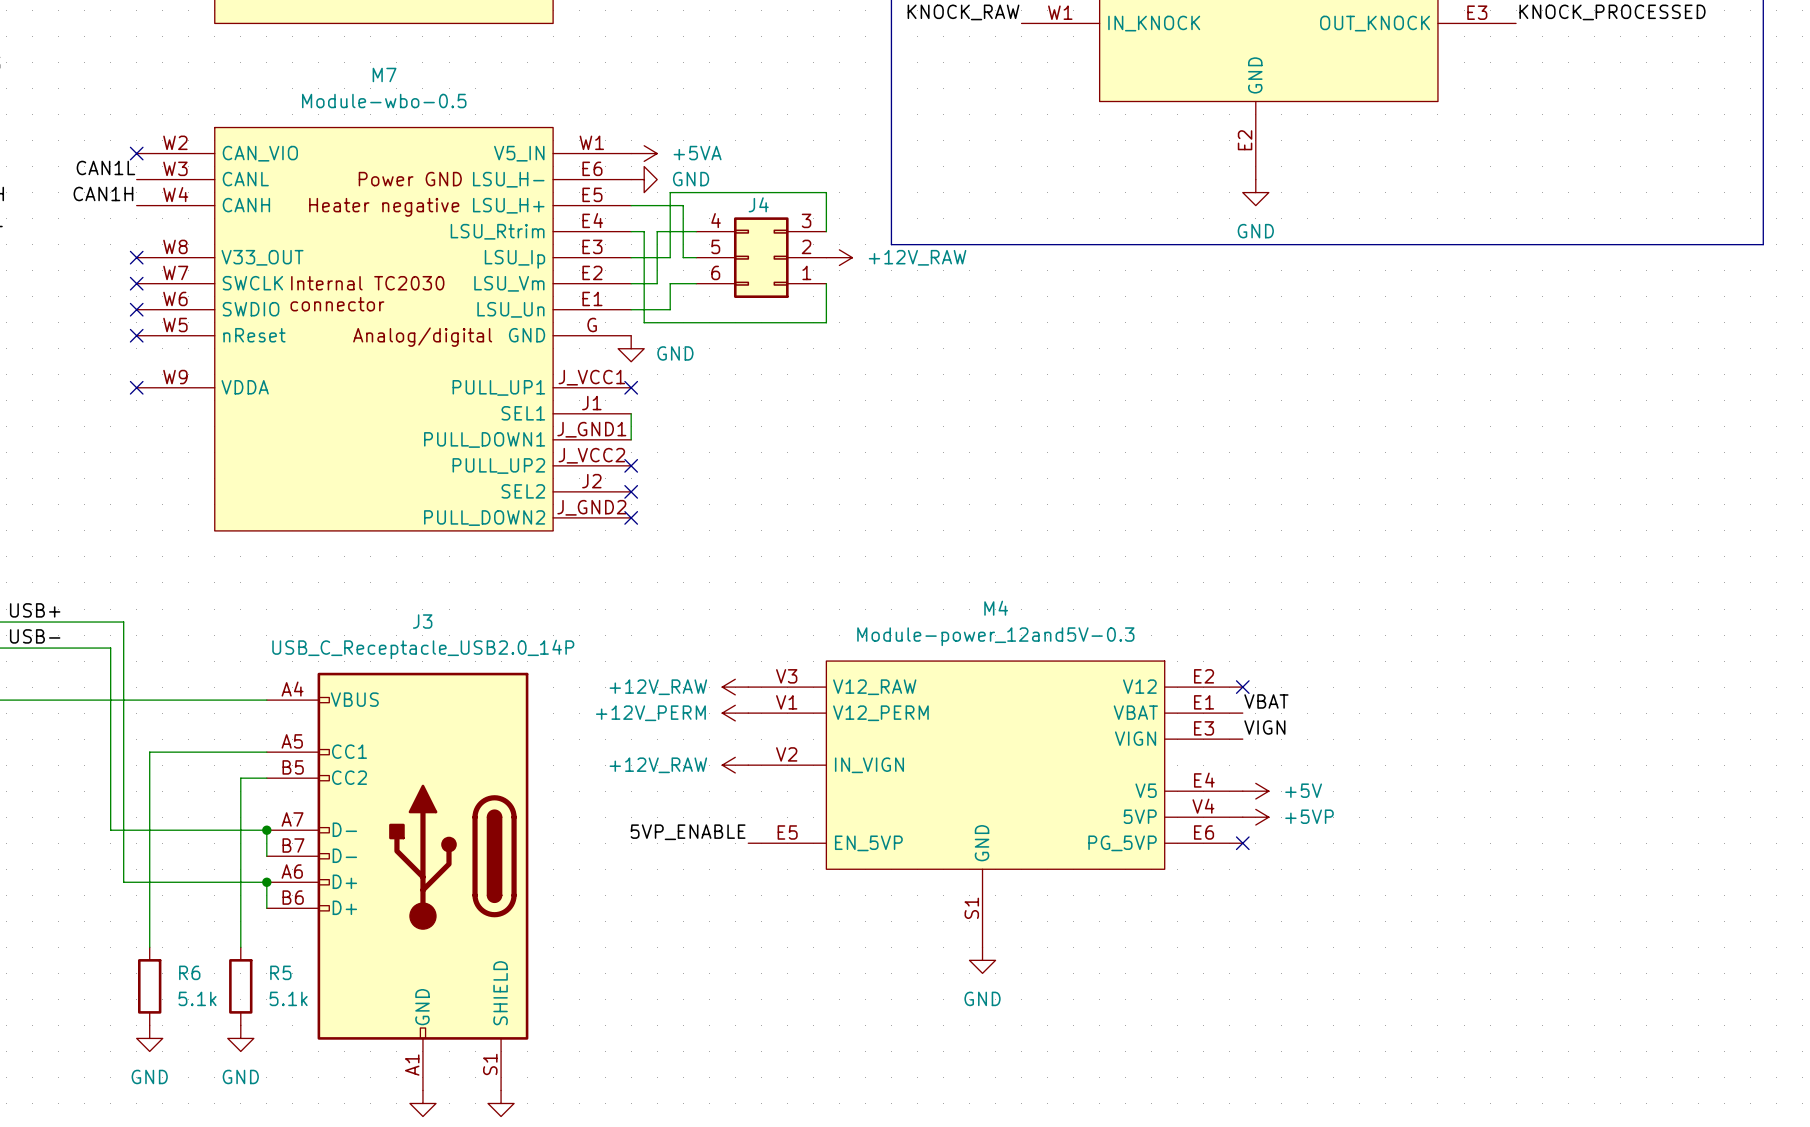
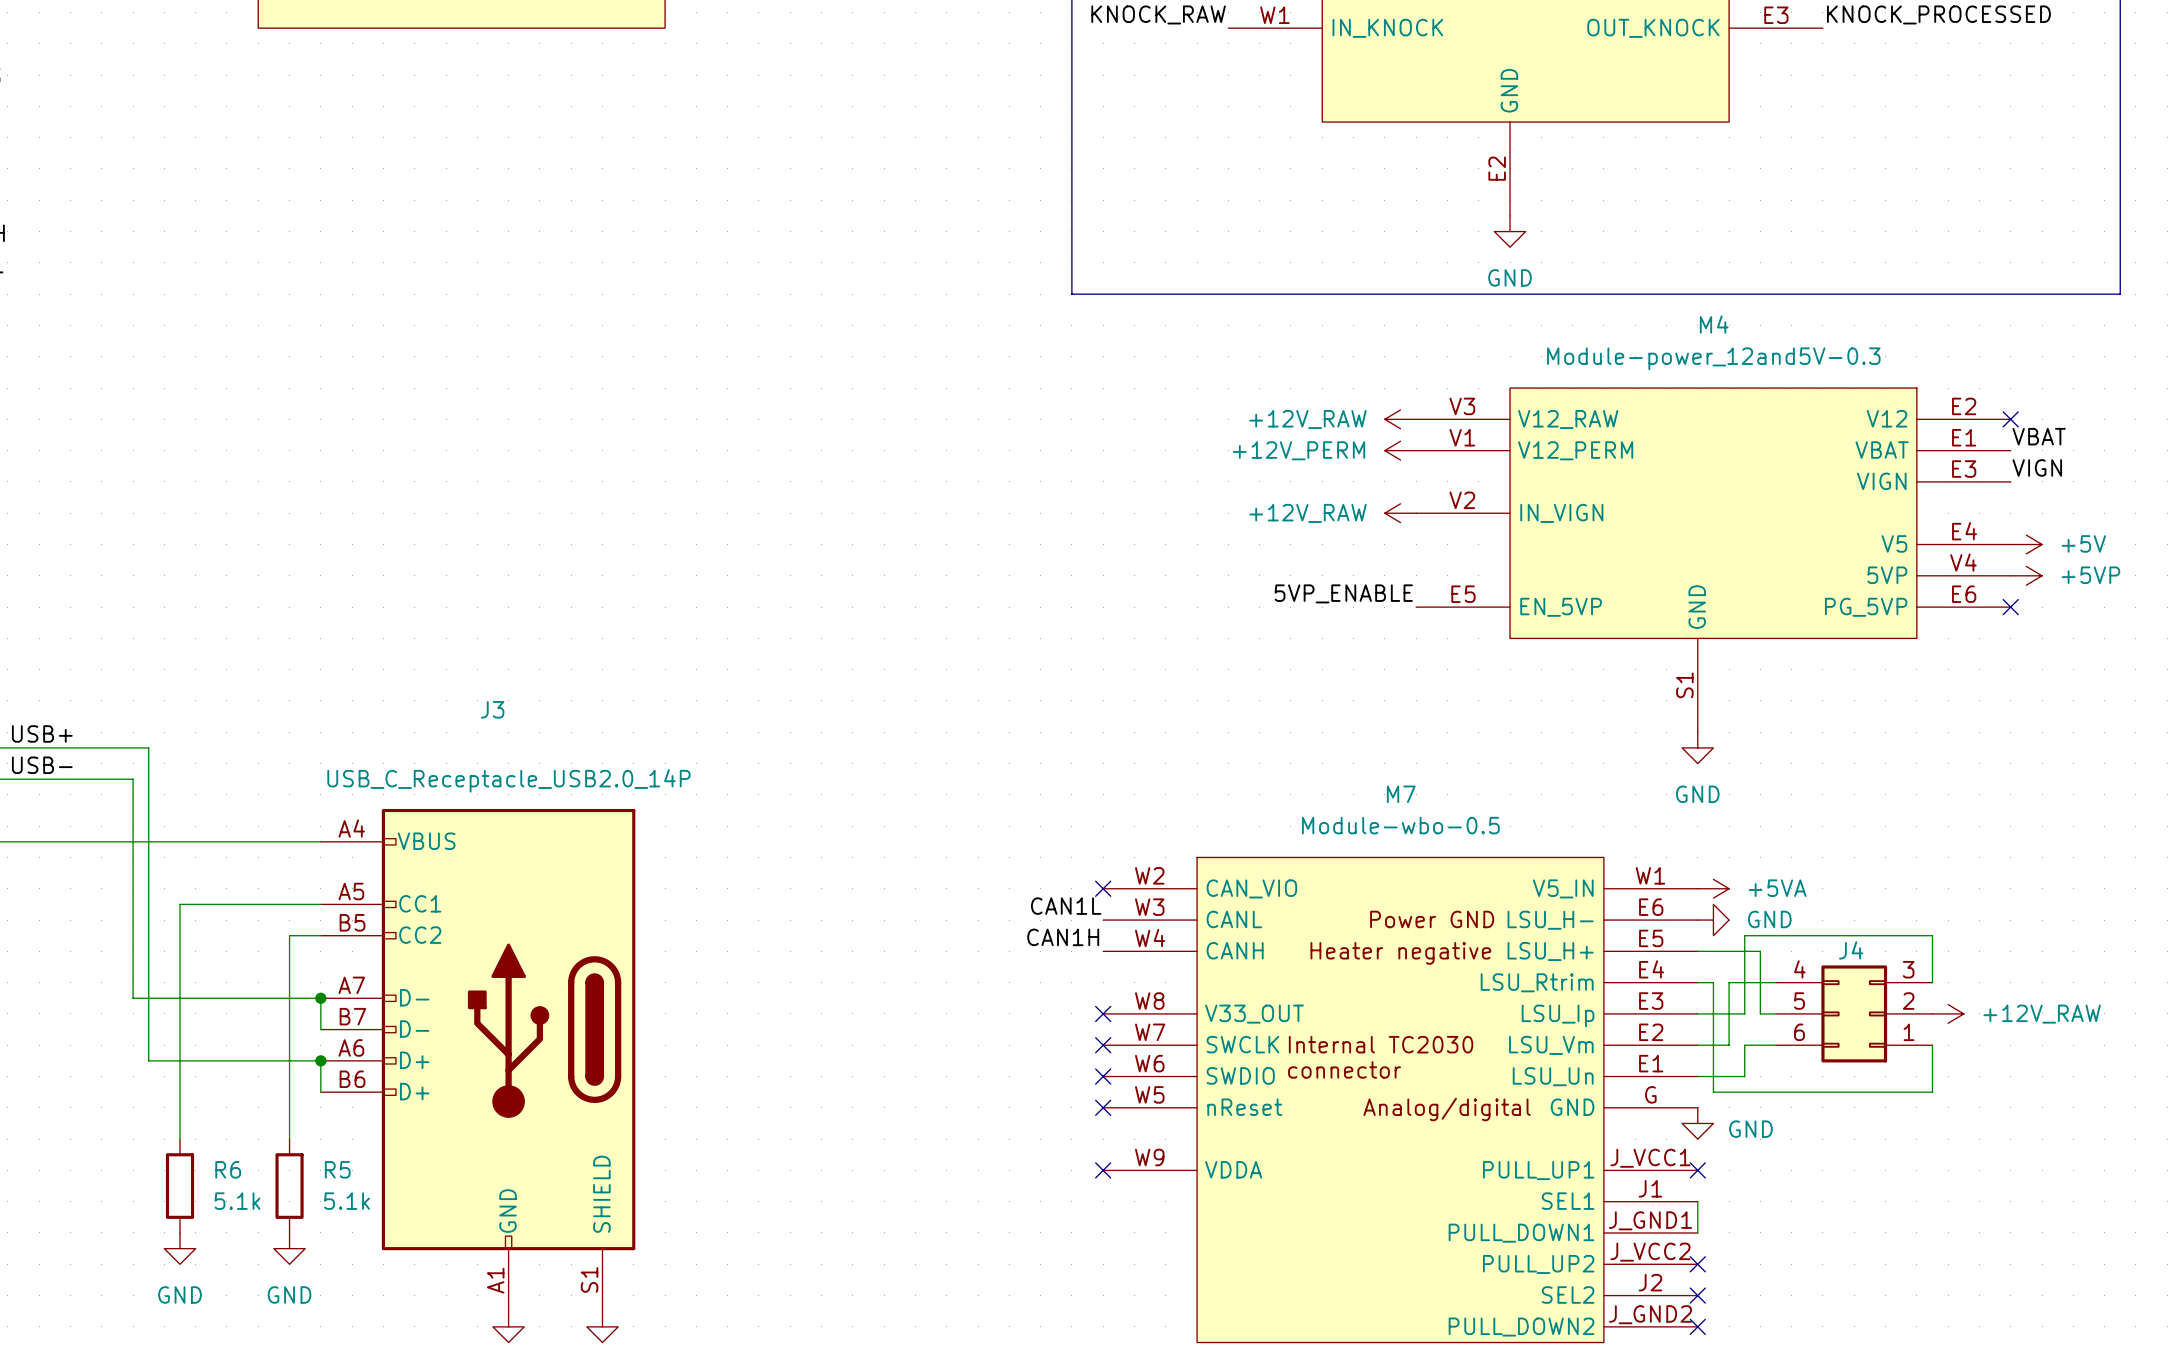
no-connect mark: (136, 153) -> none
power symbol: +5VA (644, 153) -> none
label: CAN1L (105, 167) -> none
power symbol: GND (644, 179) -> none
label: CAN1H (103, 193) -> none
wire: (631, 205) (683, 205) (683, 257) (696, 257) -> none
wire: (631, 231) (644, 231) (644, 322) (826, 322) (826, 283) -> none
wire: (696, 231) (657, 231) (657, 283) (631, 283) -> none
wire: (826, 231) (826, 192) (670, 192) (670, 257) (631, 257) -> none
no-connect mark: (136, 257) -> none
J4 position: (761, 257) -> (1854, 1013)
power symbol: +12V_RAW (839, 257) -> none
no-connect mark: (136, 283) -> none
wire: (696, 283) (670, 283) (670, 309) (631, 309) -> none
no-connect mark: (136, 309) -> none
M7 position: (383, 329) -> (1400, 1099)
no-connect mark: (136, 335) -> none
power symbol: GND (631, 348) -> none
power symbol: none -> +12V_RAW (1400, 419)
no-connect mark: none -> (2010, 419)
label: none -> VBAT (2039, 436)
power symbol: none -> +12V_PERM (1400, 450)
no-connect mark: (136, 387) -> none
no-connect mark: (631, 387) -> none
label: none -> VIGN (2037, 467)
wire: (631, 413) (631, 439) -> none
power symbol: none -> +12V_RAW (1400, 513)
power symbol: none -> +5V (2026, 544)
no-connect mark: (631, 465) -> none
power symbol: none -> +5VP (2026, 575)
no-connect mark: (631, 491) -> none
label: none -> 5VP_ENABLE (1343, 593)
no-connect mark: none -> (2010, 607)
no-connect mark: (631, 517) -> none
J3 name position: J3 (422, 621) -> J3 (492, 709)
power symbol: none -> GND (1697, 747)
power symbol: +12V_RAW (735, 687) -> none
no-connect mark: (1242, 687) -> none
label: VBAT (1266, 701) -> none
power symbol: +12V_PERM (735, 713) -> none
label: VIGN (1264, 727) -> none
no-connect mark: none -> (1103, 888)
power symbol: none -> +5VA (1713, 888)
label: none -> CAN1L (1066, 906)
power symbol: +12V_RAW (735, 765) -> none
power symbol: none -> GND (1713, 920)
label: none -> CAN1H (1063, 937)
power symbol: +5V (1255, 791) -> none
wire: none -> (1697, 951) (1760, 951) (1760, 1013) (1776, 1013)
M4 position: (995, 804) -> (1713, 560)
power symbol: +5VP (1255, 817) -> none
wire: none -> (1697, 982) (1713, 982) (1713, 1092) (1932, 1092) (1932, 1045)
wire: none -> (1776, 982) (1729, 982) (1729, 1045) (1697, 1045)
wire: none -> (1932, 982) (1932, 935) (1744, 935) (1744, 1013) (1697, 1013)
label: 5VP_ENABLE (688, 832) -> none
no-connect mark: none -> (1103, 1013)
no-connect mark: (1242, 843) -> none
power symbol: none -> +12V_RAW (1948, 1013)
no-connect mark: none -> (1103, 1045)
wire: none -> (1776, 1045) (1744, 1045) (1744, 1076) (1697, 1076)
no-connect mark: none -> (1103, 1076)
no-connect mark: none -> (1103, 1107)
power symbol: none -> GND (1697, 1123)
power symbol: GND (982, 960) -> none
no-connect mark: none -> (1103, 1170)
no-connect mark: none -> (1697, 1170)
wire: none -> (1697, 1201) (1697, 1232)
no-connect mark: none -> (1697, 1264)
no-connect mark: none -> (1697, 1295)
no-connect mark: none -> (1697, 1326)

